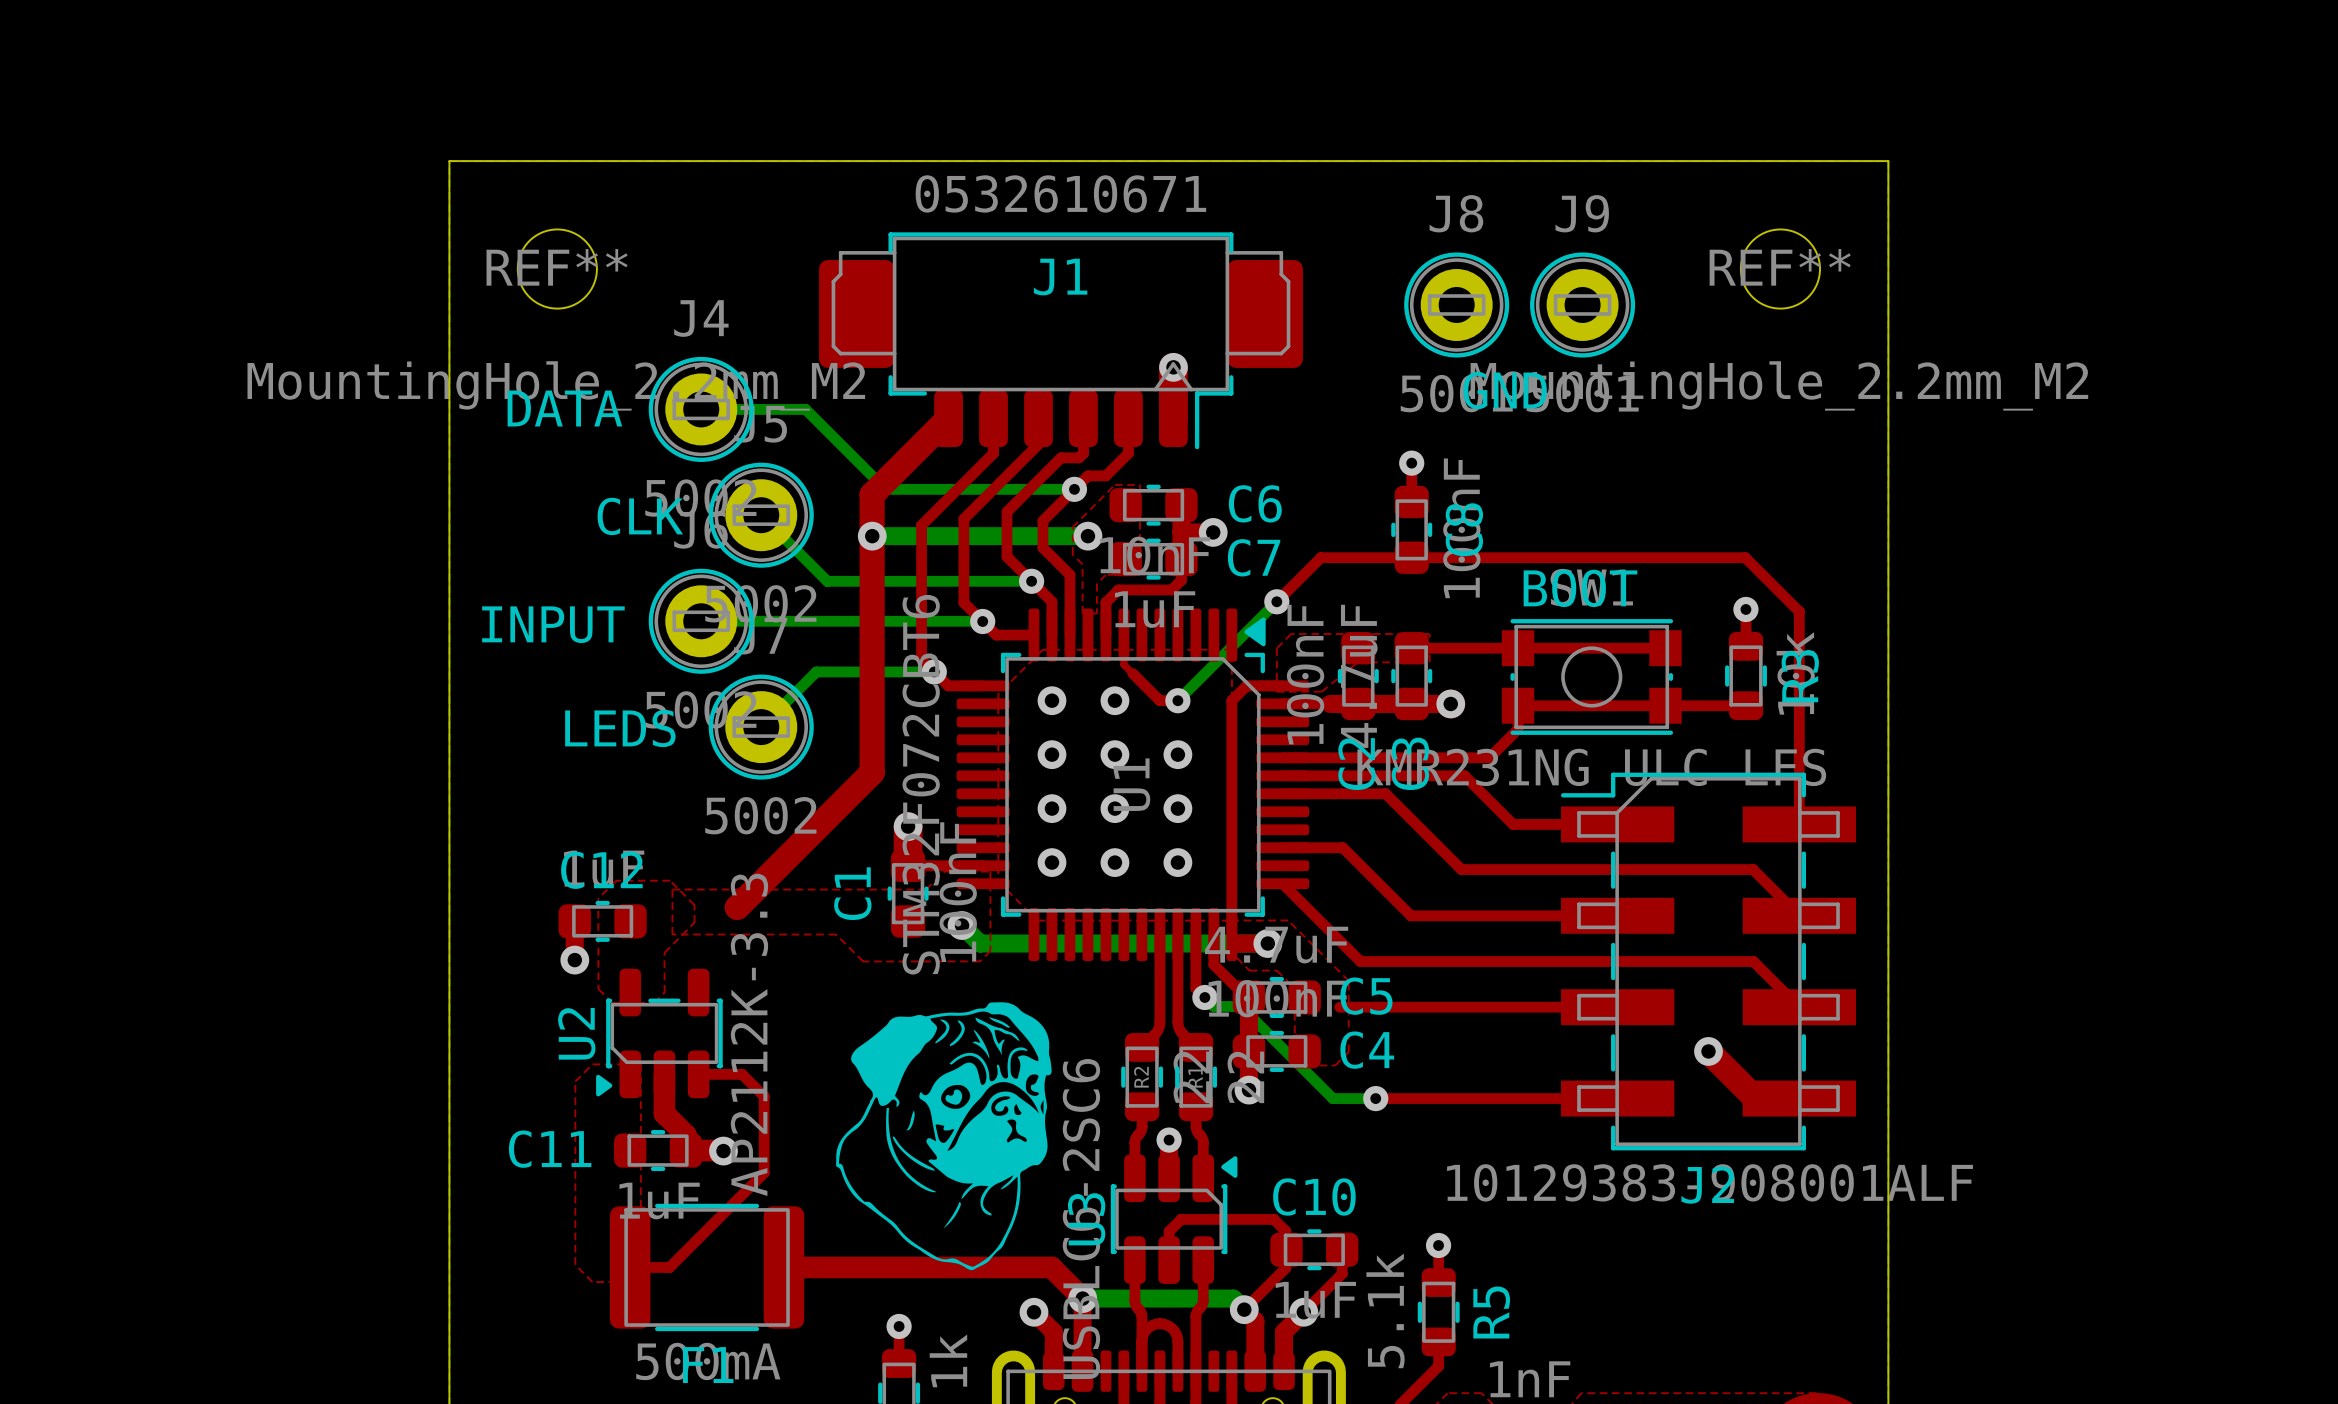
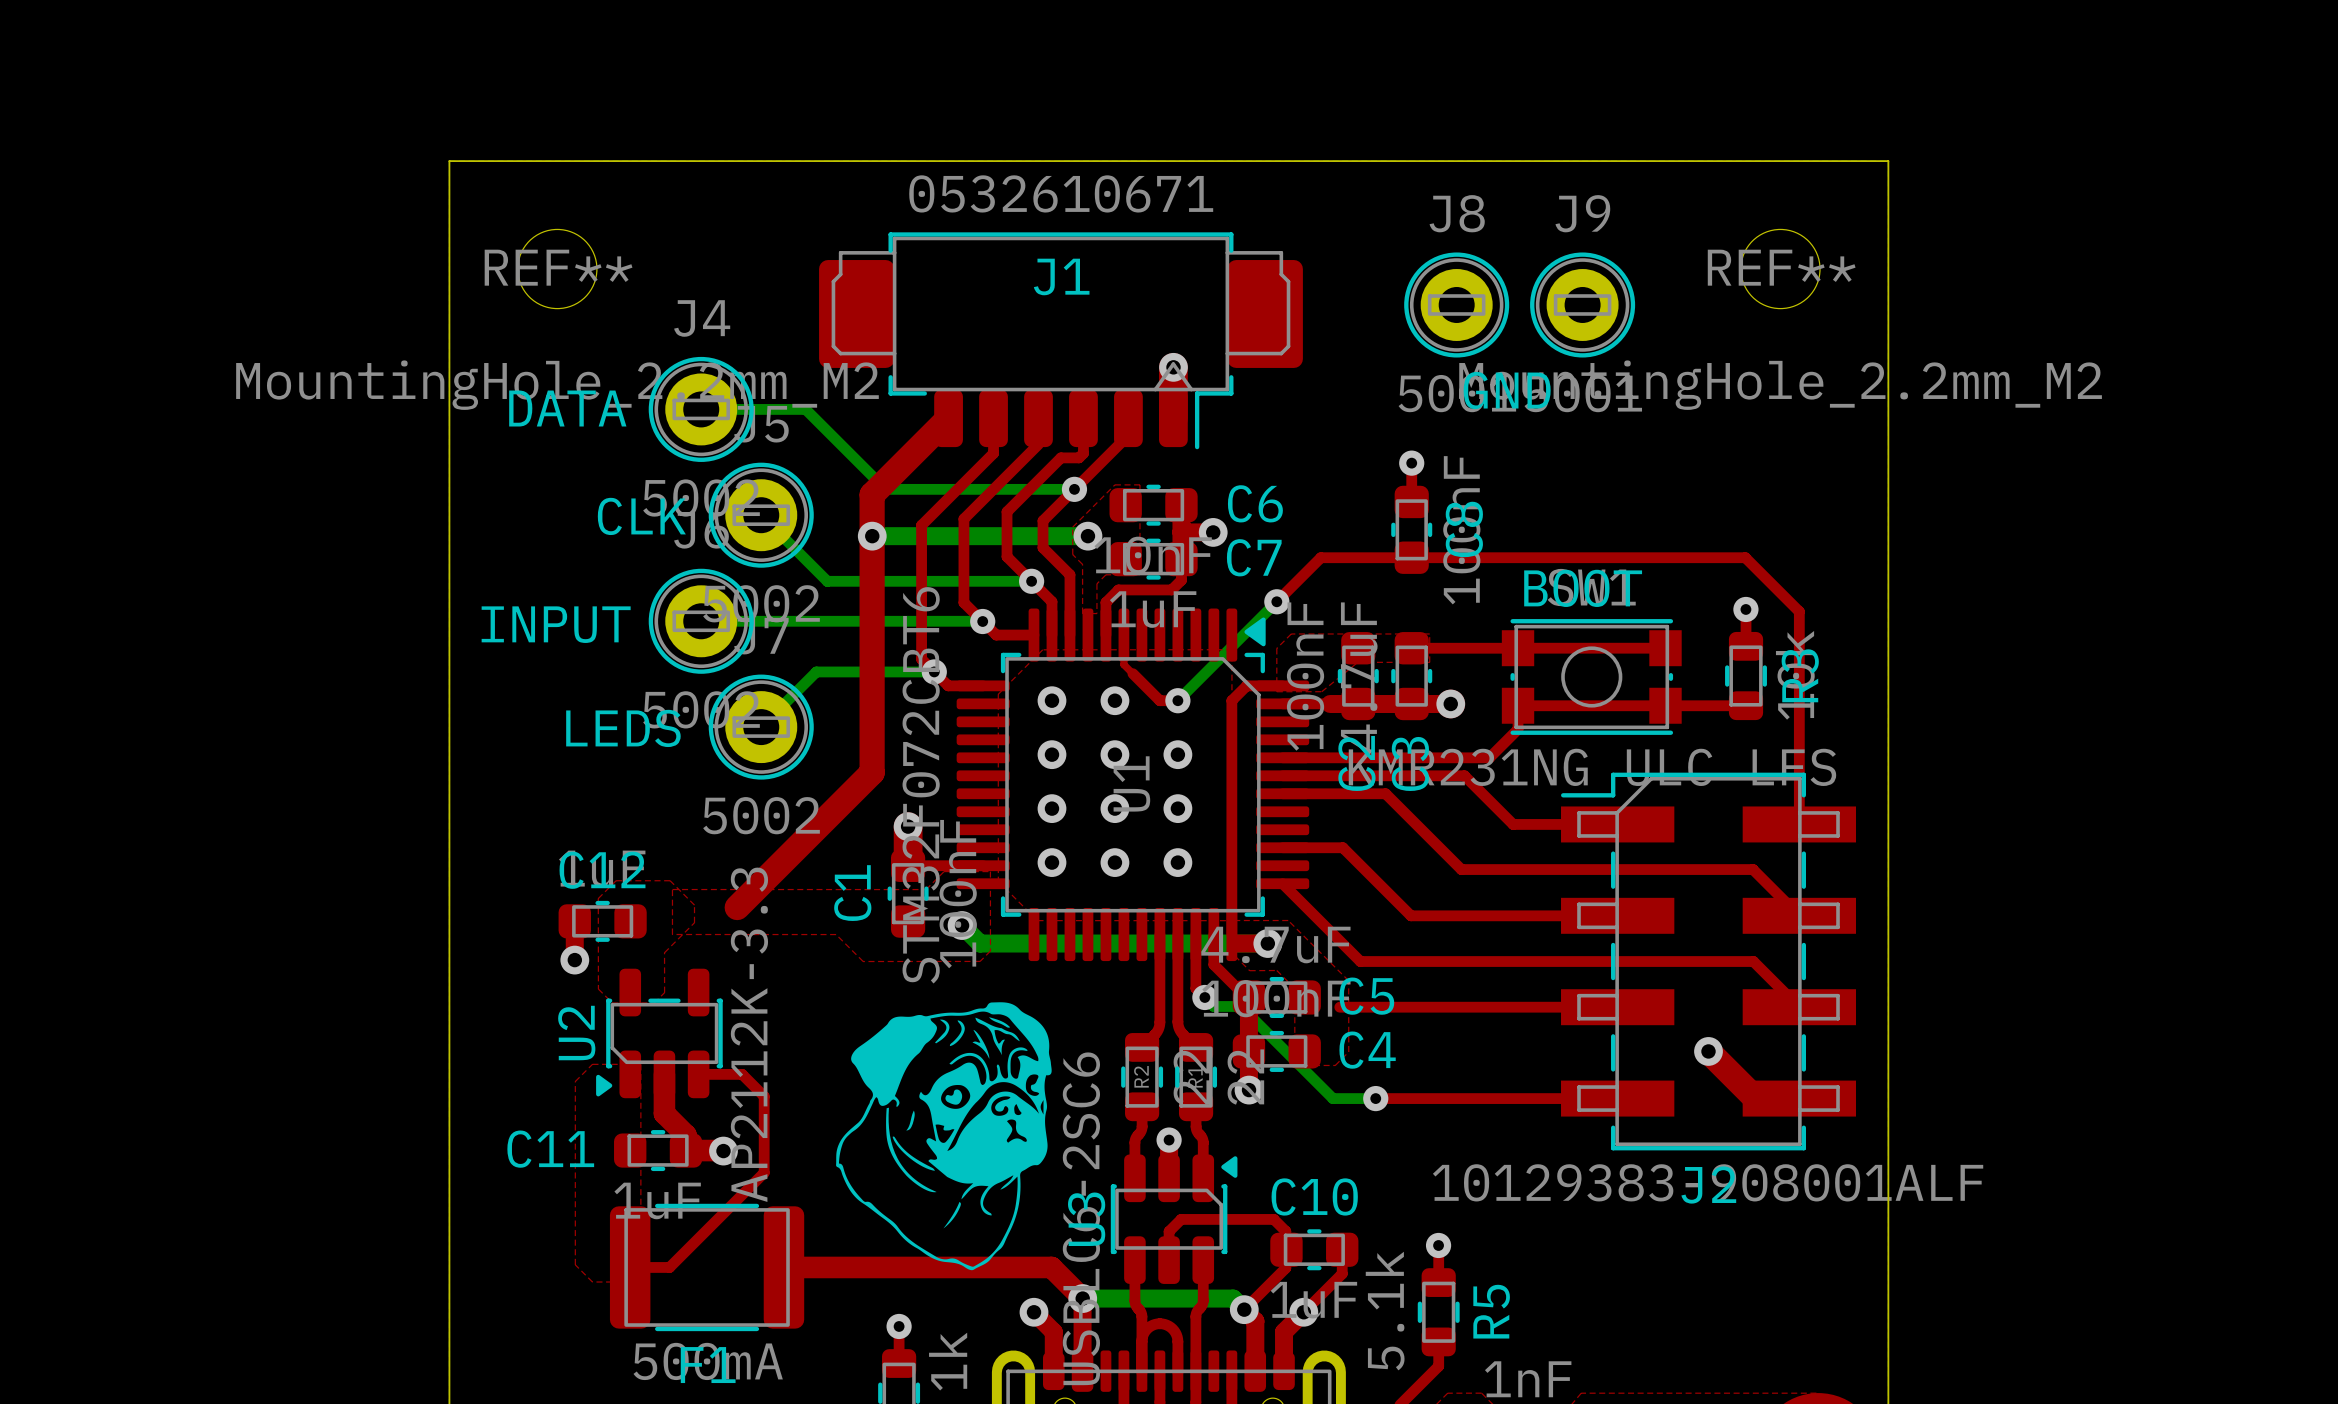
top track: (1128, 435) (1128, 453) (1105, 475) (1087, 475) -> (1128, 435) (1087, 475)

